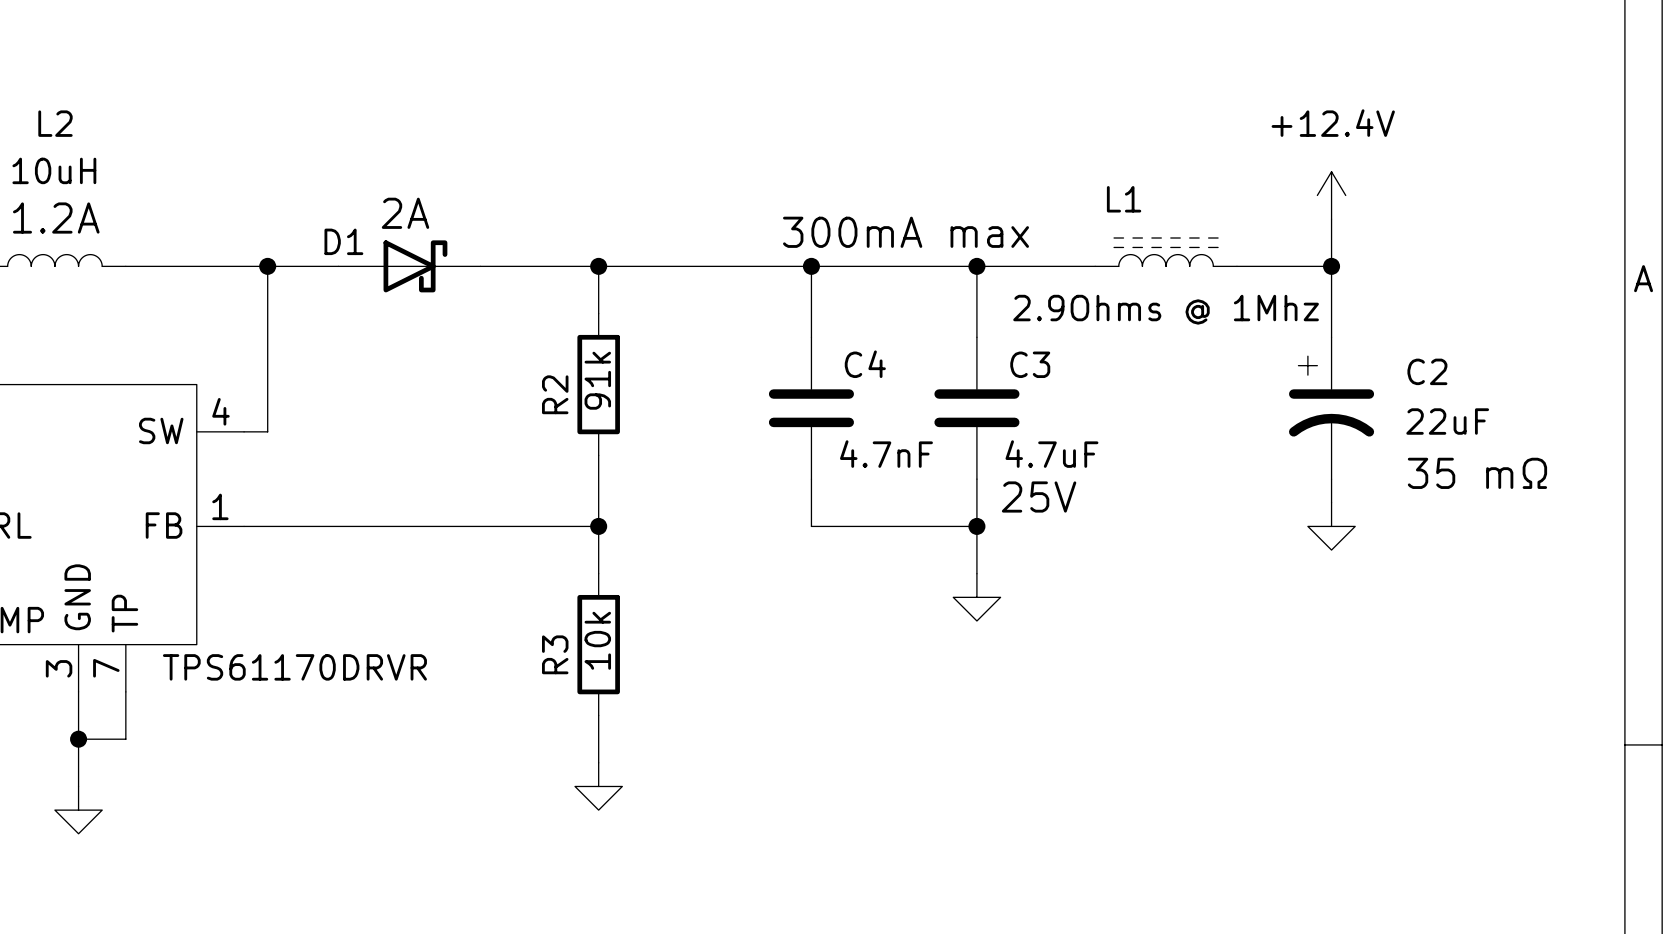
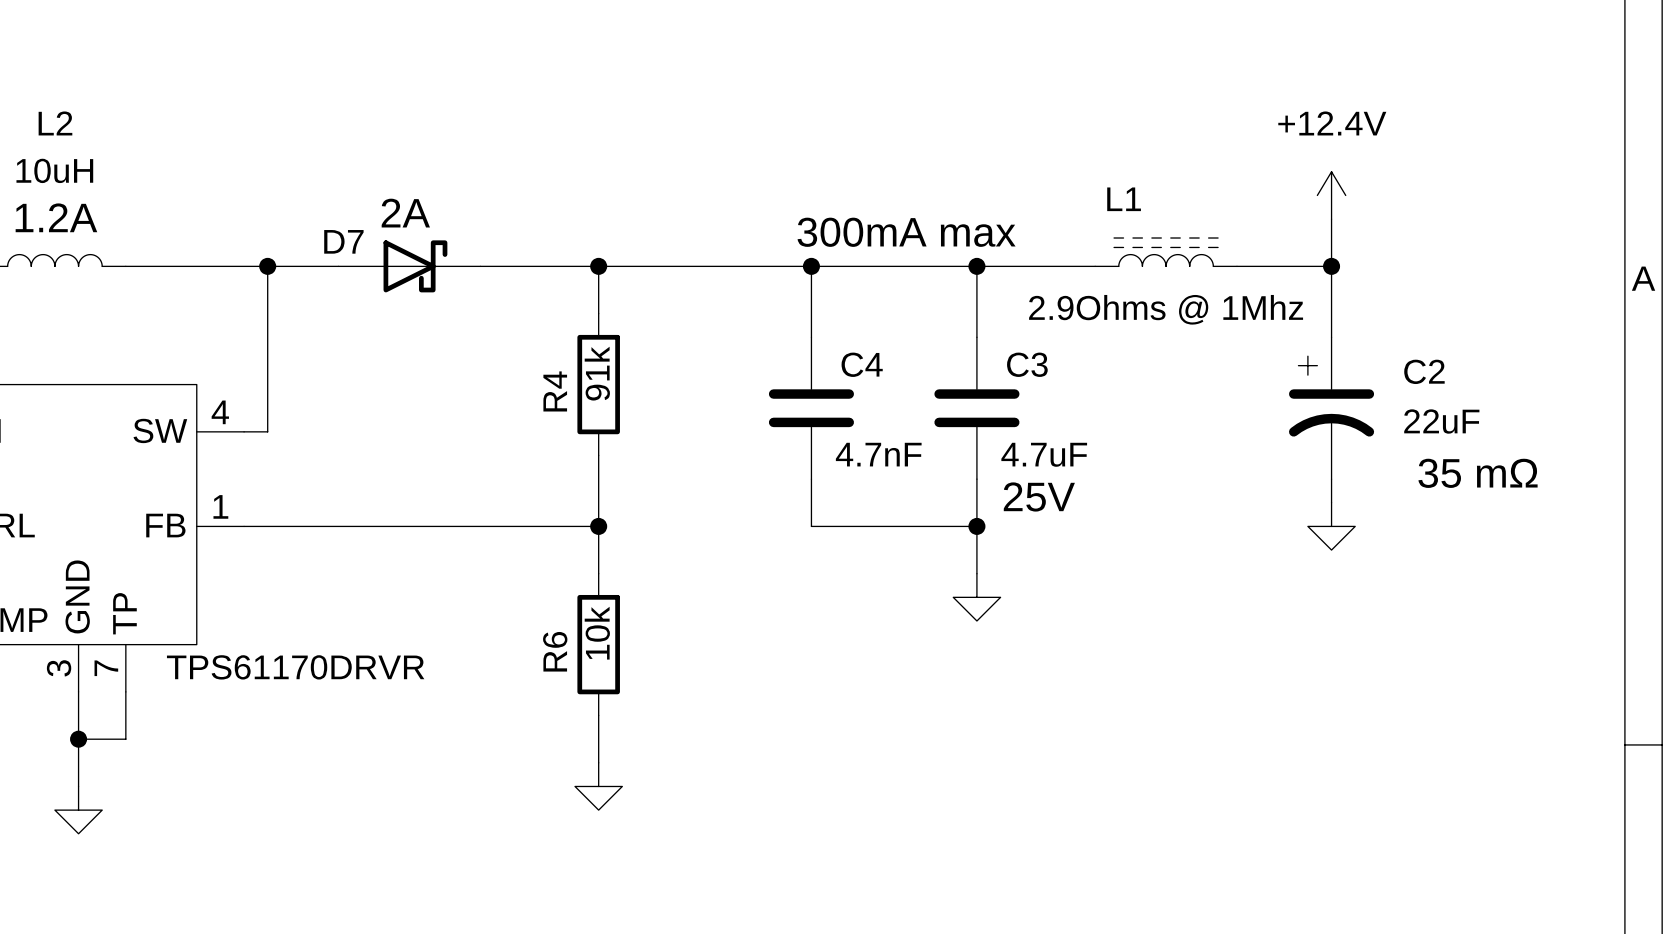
D1 name: D1 (343, 241) -> D7 (343, 241)
R2 name: R2 (555, 394) -> R4 (555, 391)
R3 name: R3 (555, 654) -> R6 (555, 651)

